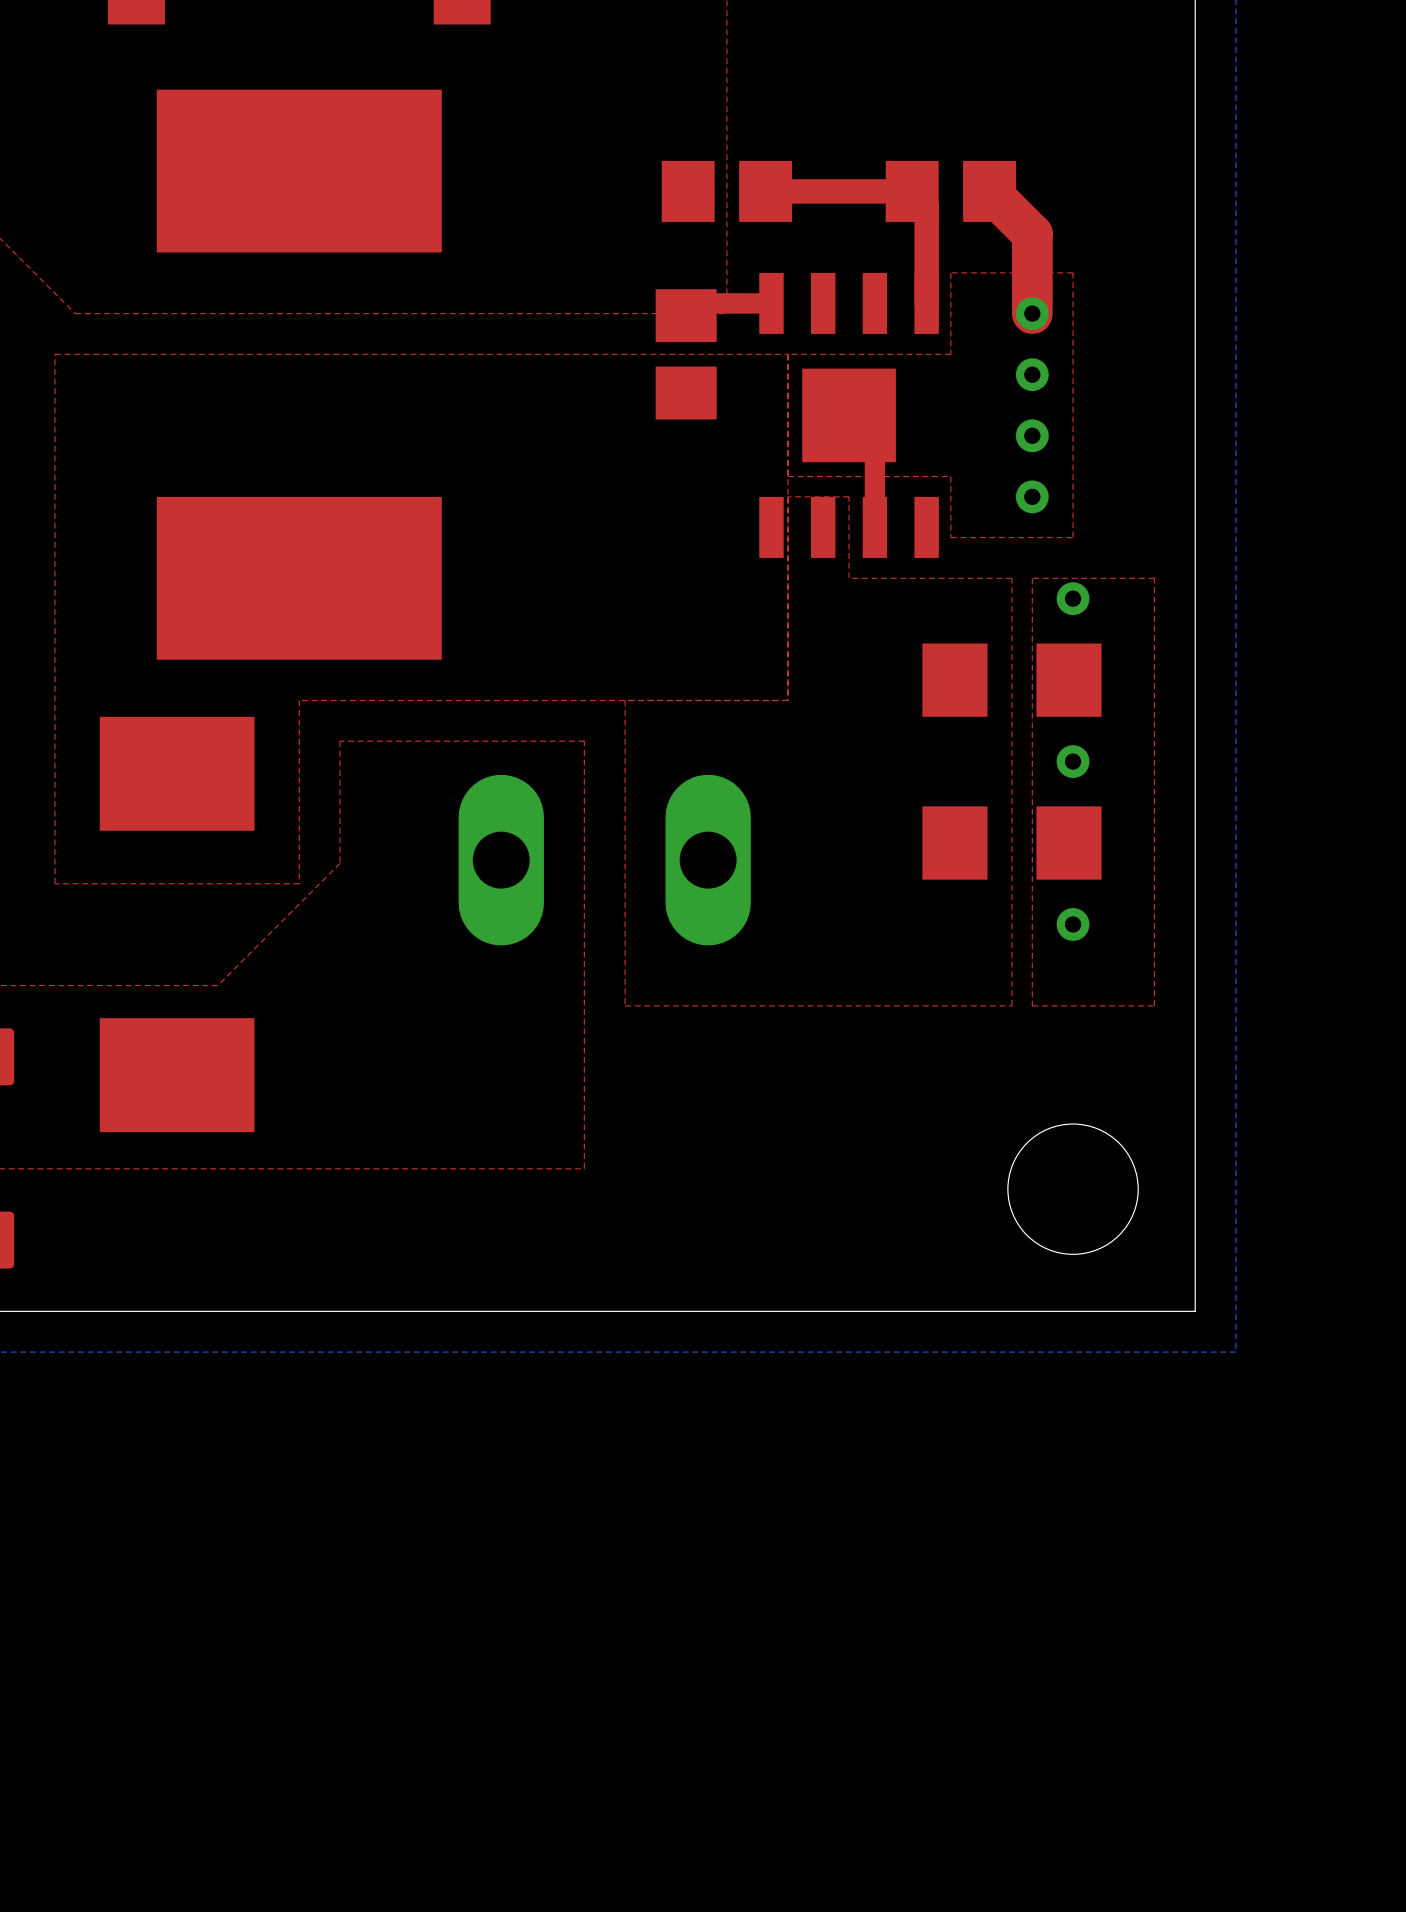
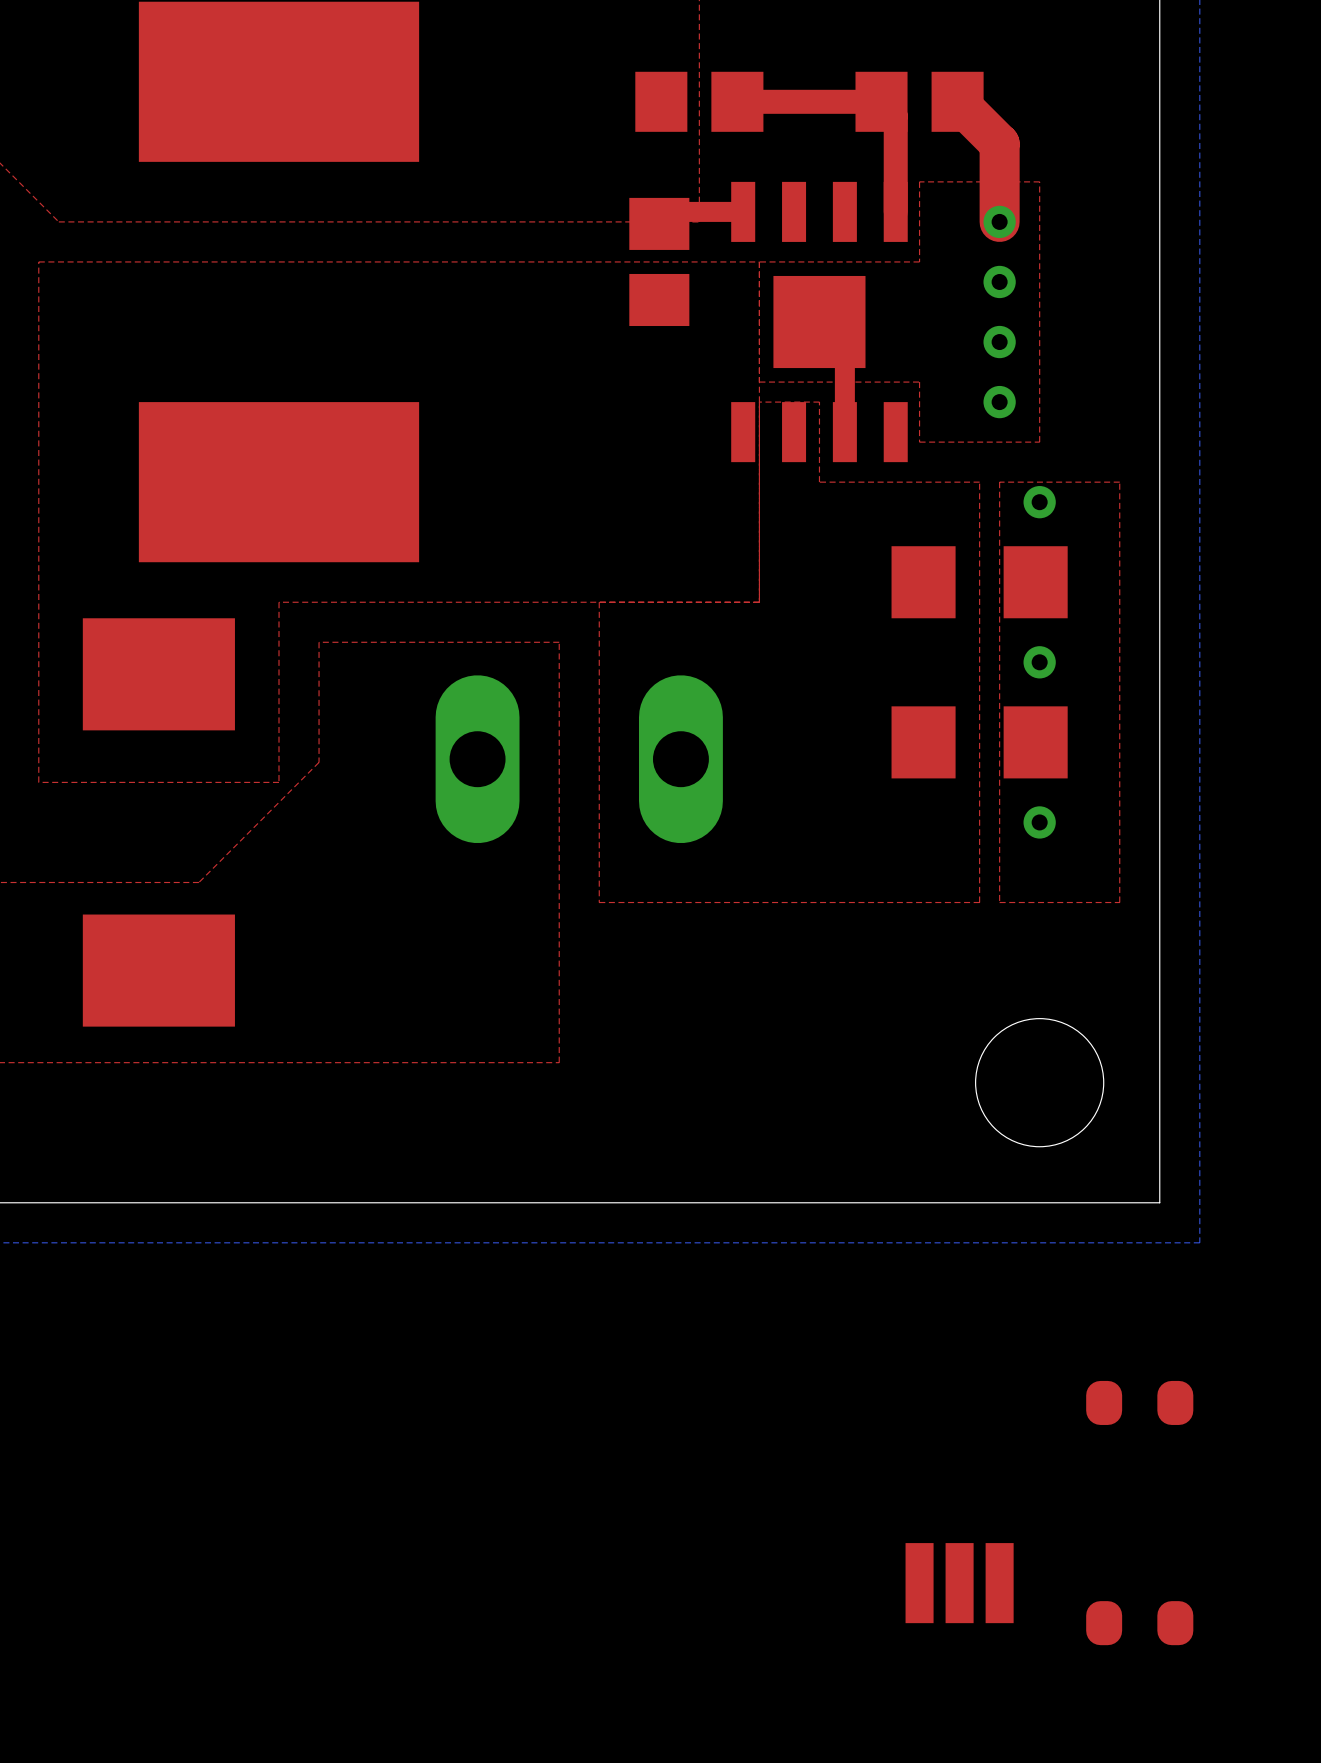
part: none -> (1139, 1402)
part: none -> (959, 1583)
part: none -> (1139, 1623)

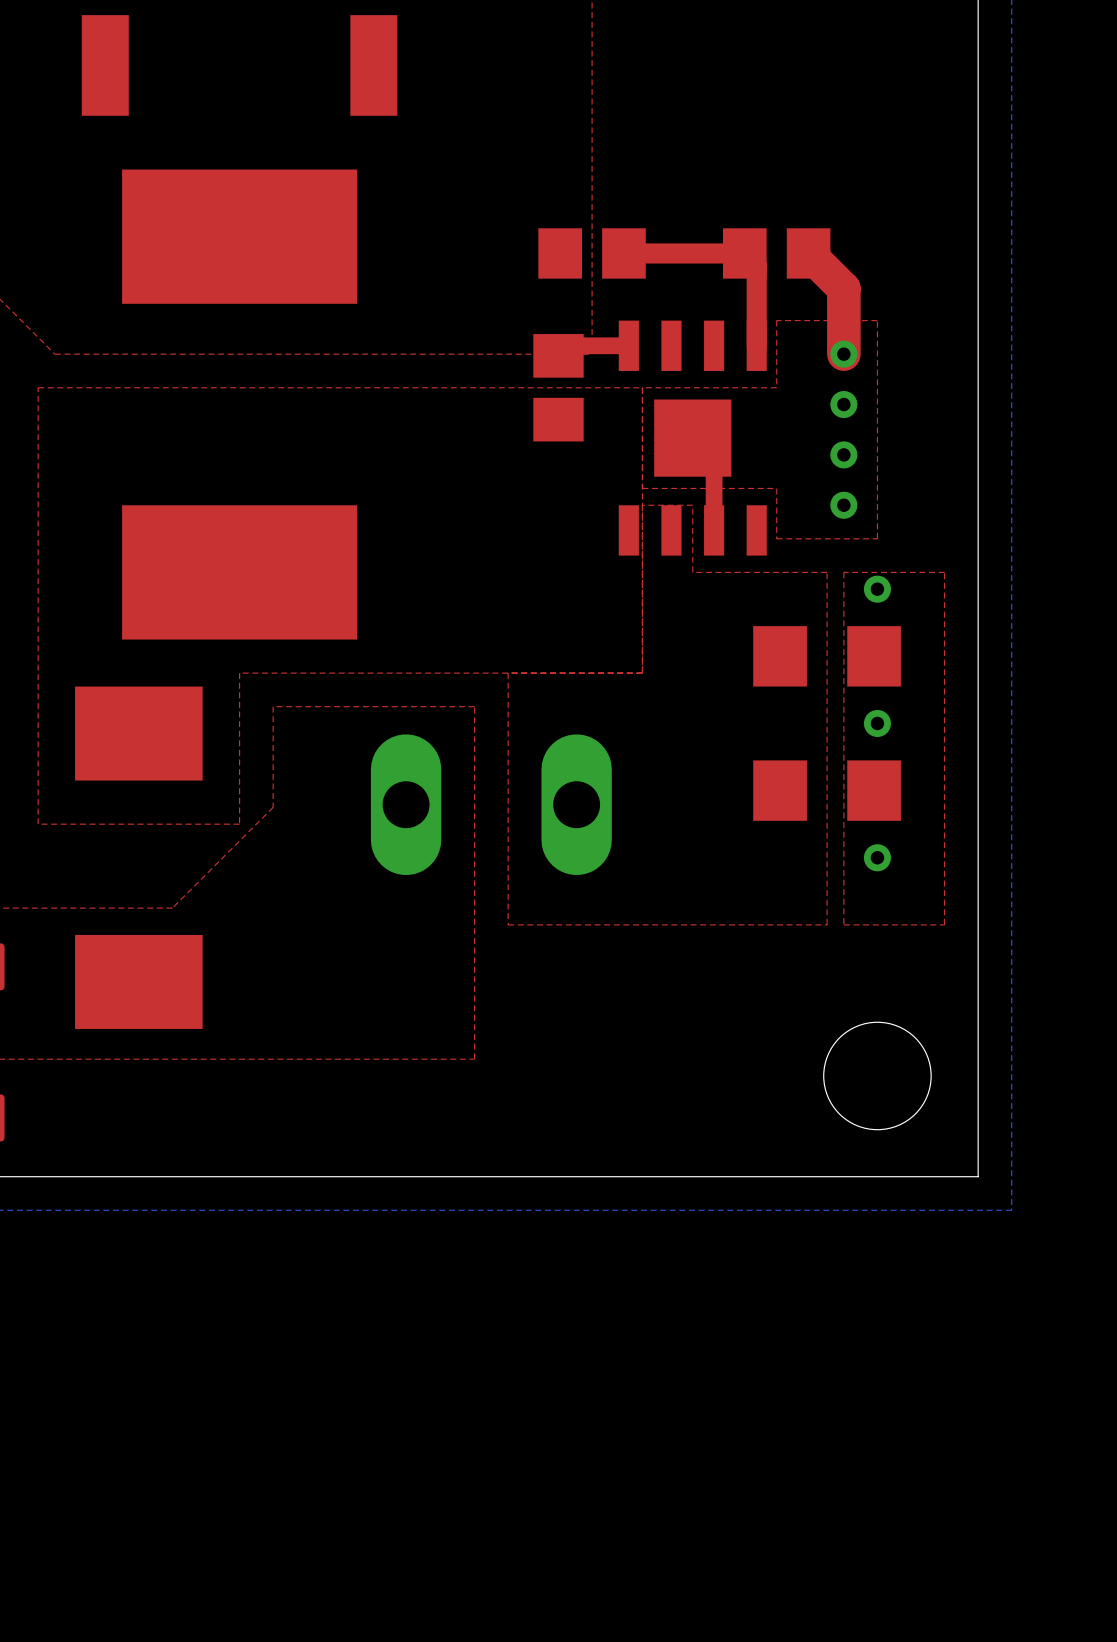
part: (1139, 1402) -> none
part: (959, 1583) -> none
part: (1139, 1623) -> none

